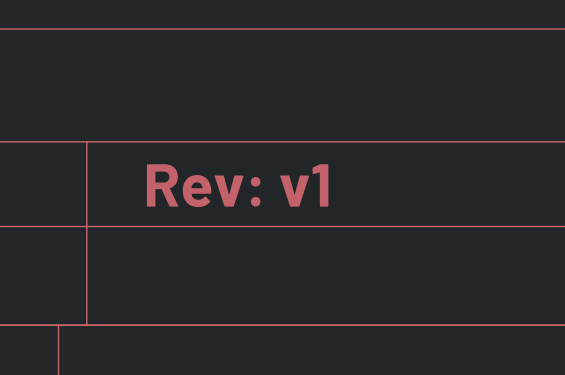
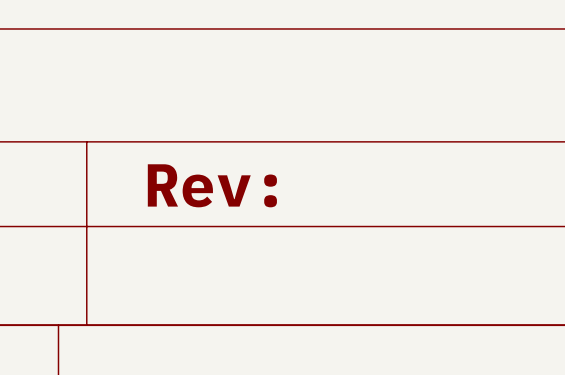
title block: Rev: v1 (237, 185) -> Rev: (212, 185)

